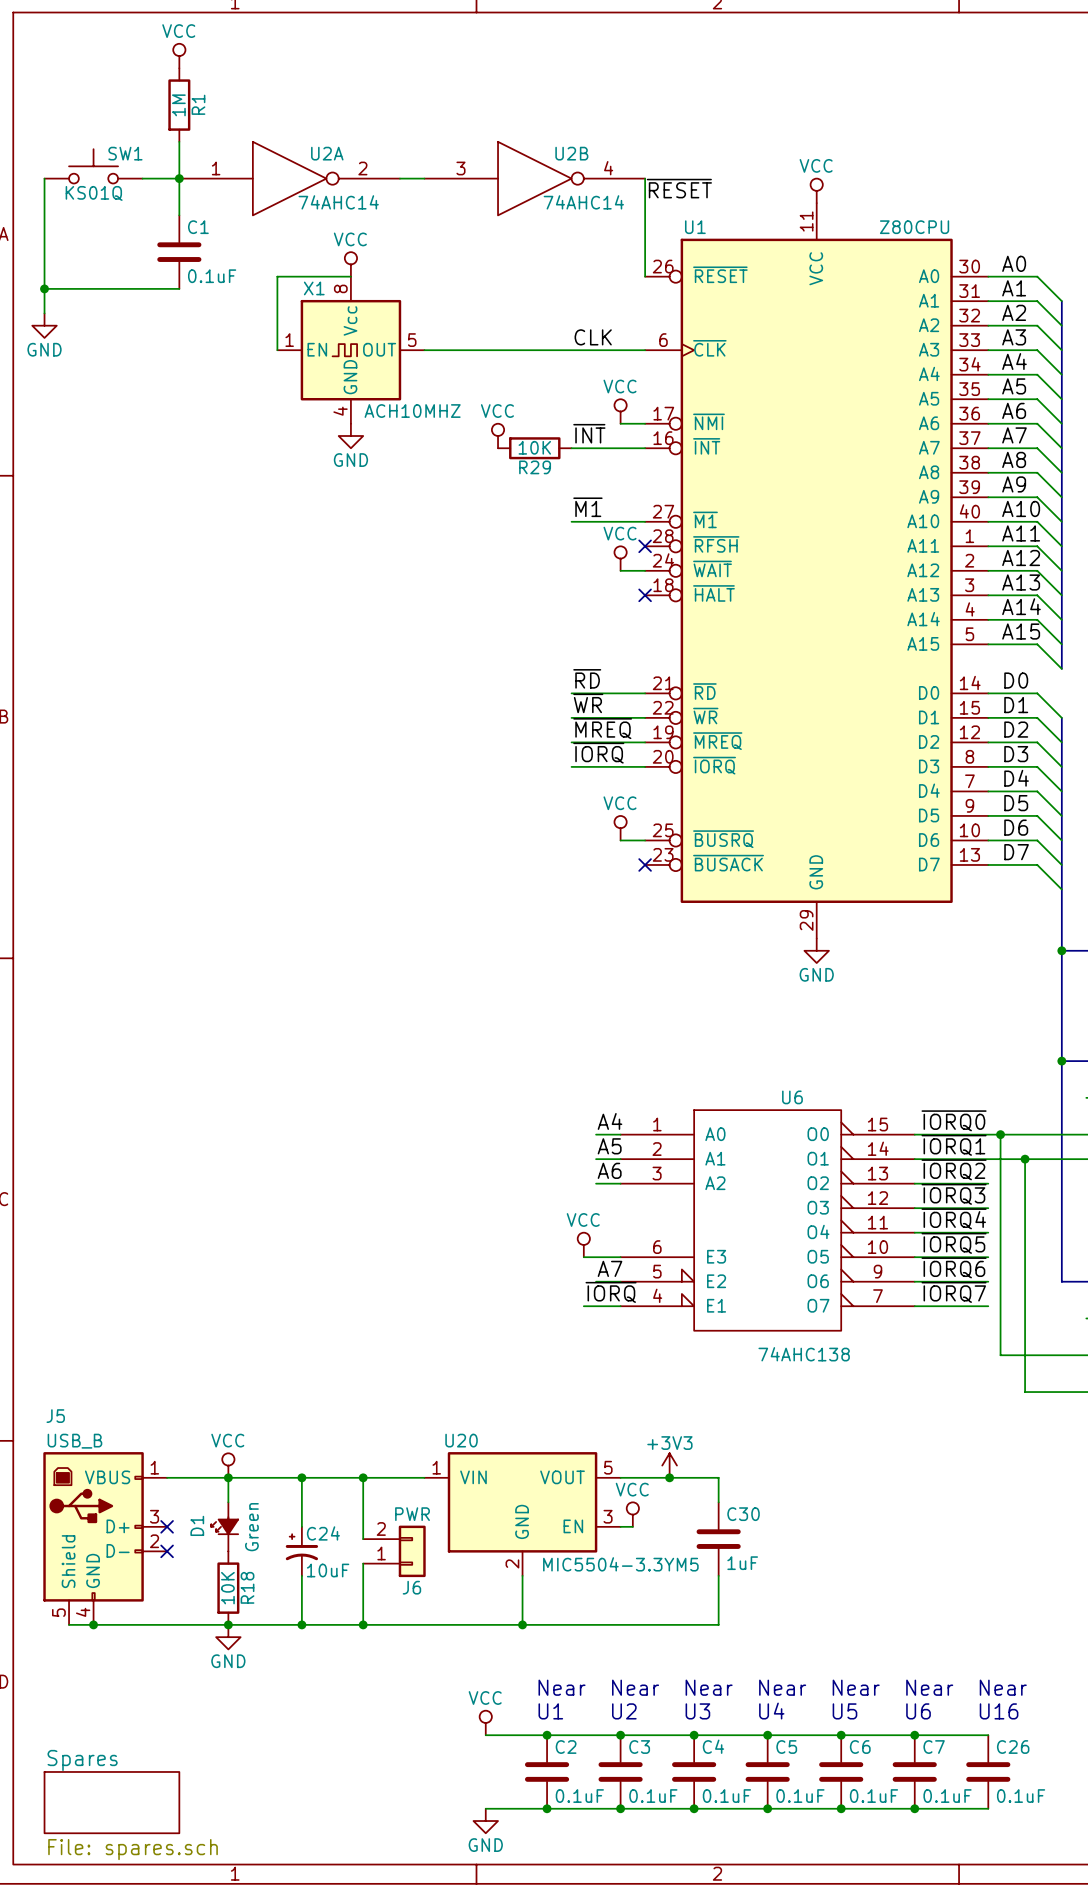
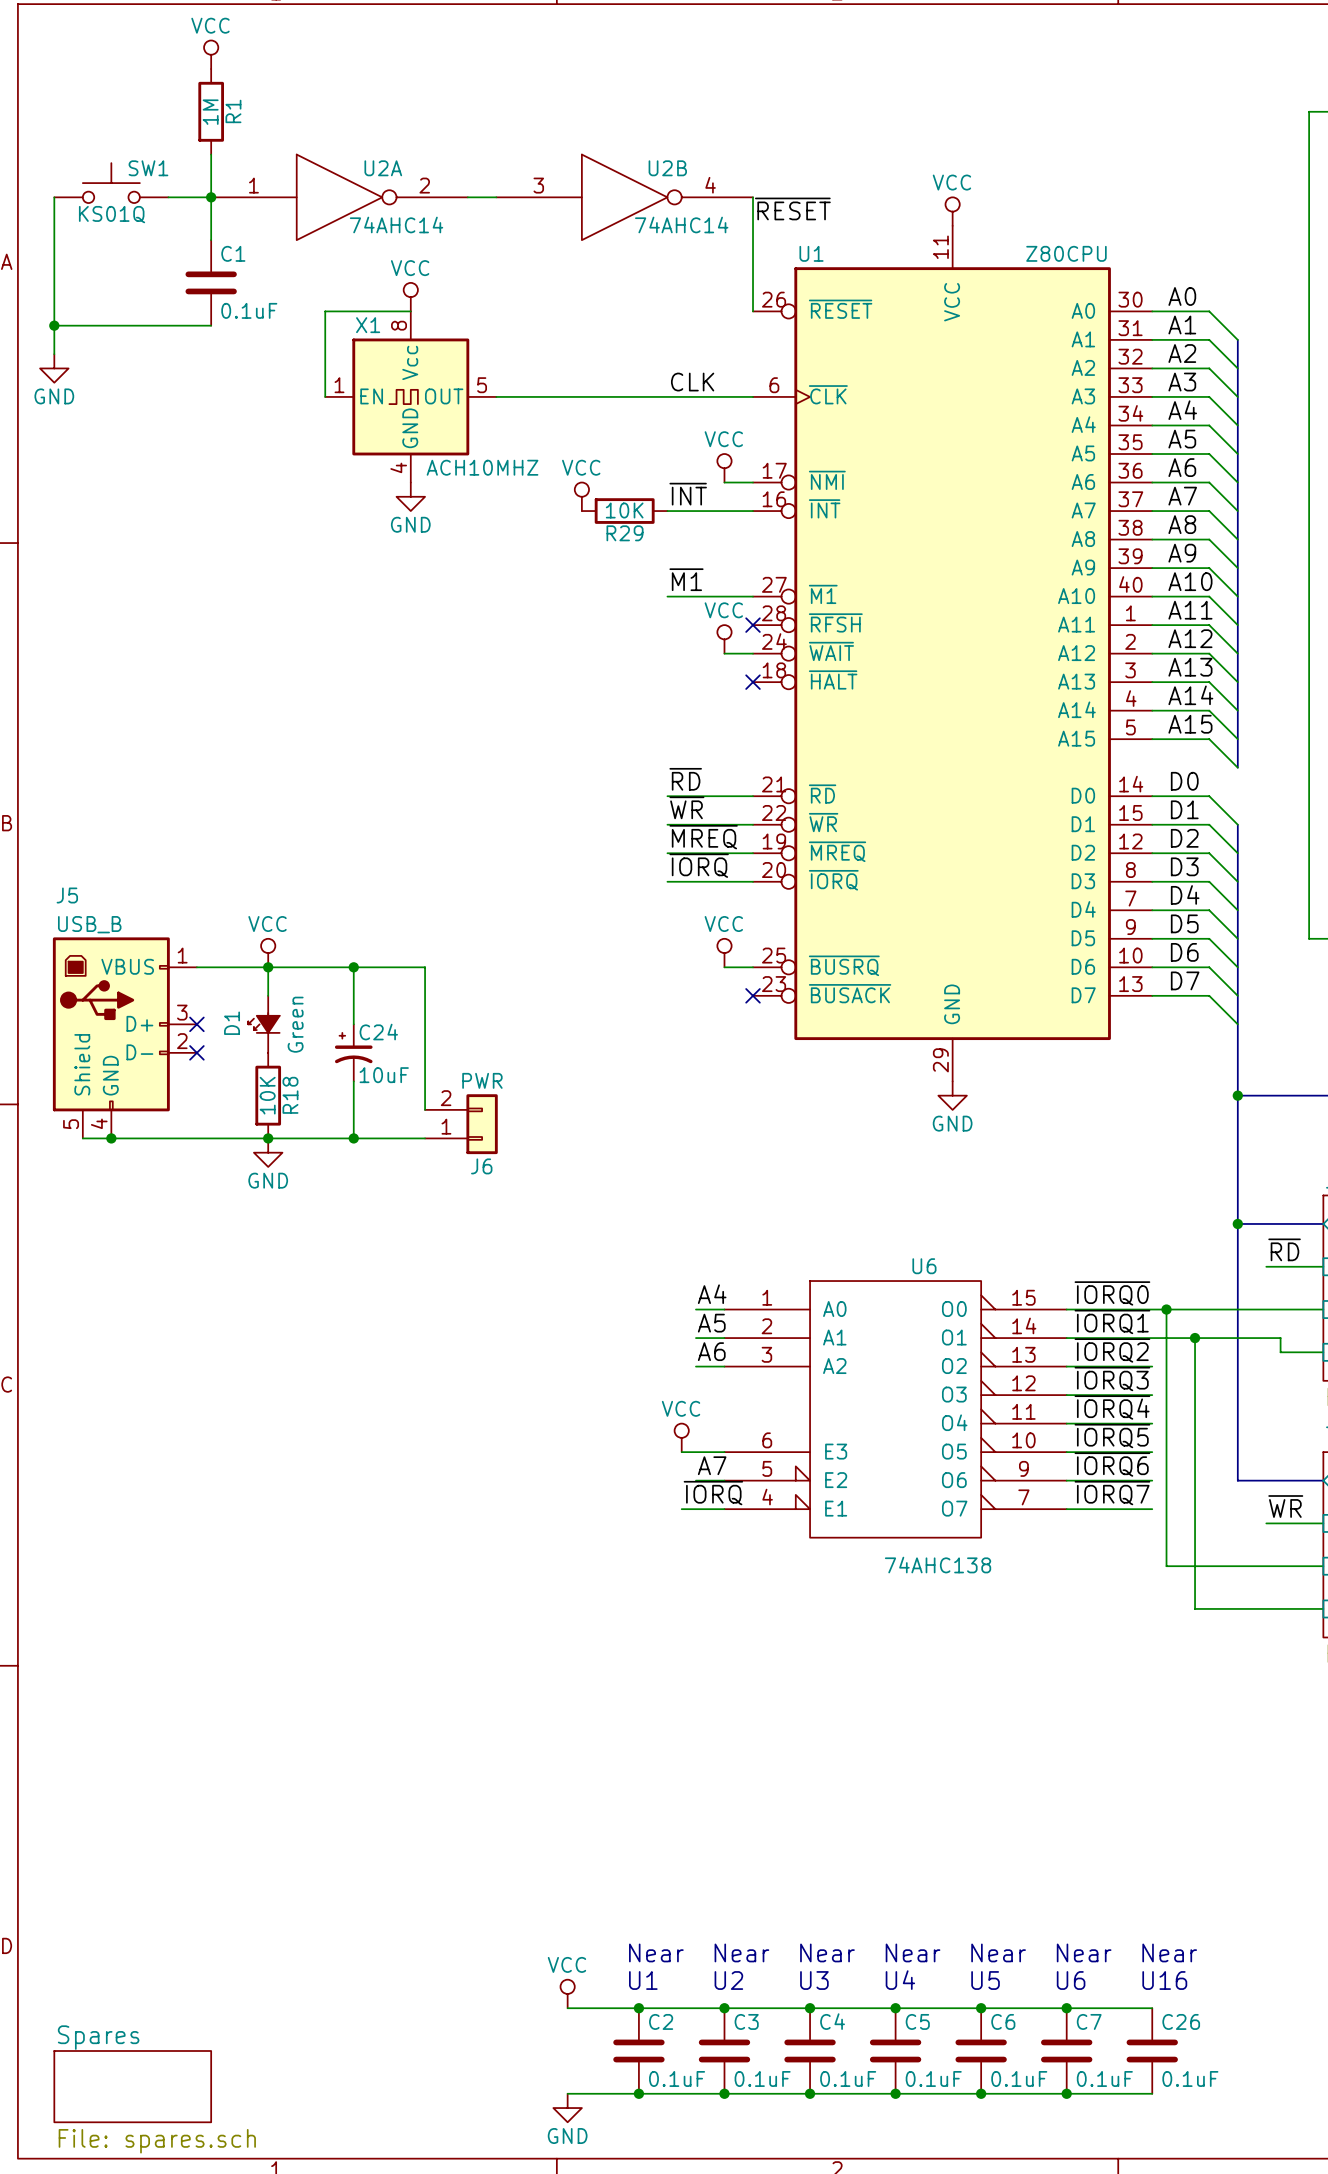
power symbol: none -> VCC (268, 953)
wire: none -> (196, 967) (425, 967) (425, 1109)
wire: none -> (268, 967) (268, 995)
junction: none -> (268, 967)
wire: none -> (353, 967) (353, 1024)
junction: none -> (353, 967)
no-connect mark: none -> (196, 1024)
no-connect mark: none -> (196, 1052)
wire: none -> (353, 1081) (353, 1138)
wire: none -> (82, 1138) (425, 1138)
junction: none -> (111, 1138)
junction: none -> (268, 1138)
junction: none -> (353, 1138)
power symbol: none -> GND (268, 1152)
power symbol: VCC (228, 1465) -> none
power symbol: +3V3 (669, 1465) -> none
wire: (167, 1477) (424, 1477) -> none
wire: (228, 1477) (228, 1502) -> none
junction: (228, 1477) -> none
wire: (301, 1477) (301, 1526) -> none
junction: (301, 1477) -> none
wire: (363, 1477) (363, 1539) -> none
junction: (363, 1477) -> none
wire: (620, 1477) (718, 1477) (718, 1502) -> none
junction: (669, 1477) -> none
U20: MIC5504-3.3YM5 (522, 1513) -> none
power symbol: VCC (632, 1514) -> none
no-connect mark: (167, 1526) -> none
D1 position: (224, 1526) -> (263, 1024)
wire: (620, 1526) (632, 1526) -> none
J5 position: (105, 1538) -> (124, 1037)
C30: 1uF (718, 1539) -> none
no-connect mark: (167, 1551) -> none
C24 position: (301, 1551) -> (353, 1052)
J6 position: (394, 1551) -> (461, 1124)
wire: (363, 1563) (363, 1624) -> none
wire: (301, 1575) (301, 1624) -> none
wire: (522, 1575) (522, 1624) -> none
wire: (718, 1575) (718, 1624) (69, 1624) -> none
R18 position: (228, 1588) -> (268, 1095)
junction: (93, 1624) -> none
junction: (228, 1624) -> none
junction: (301, 1624) -> none
junction: (363, 1624) -> none
junction: (522, 1624) -> none
power symbol: GND (228, 1637) -> none

